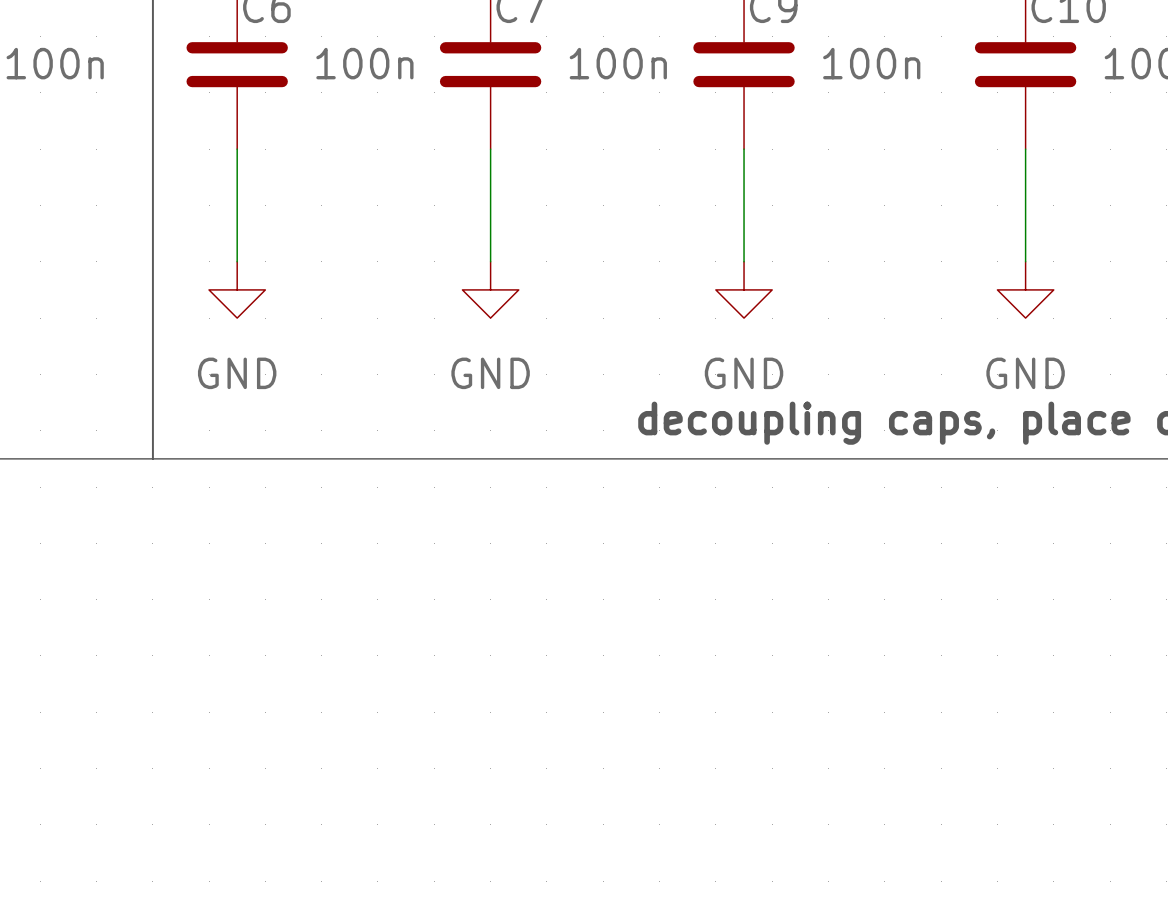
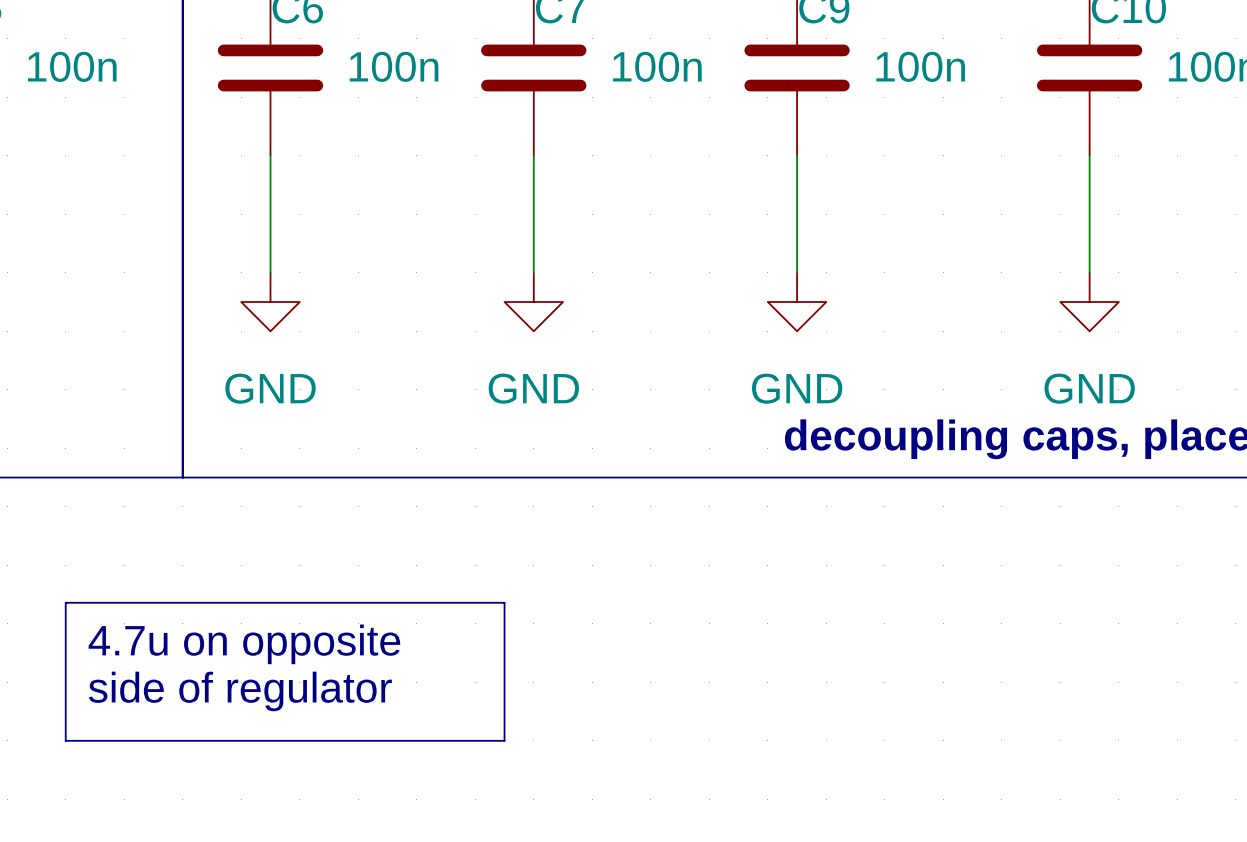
line: none -> (65, 602) (504, 602) (504, 740) (65, 740) (65, 602)
text: none -> 4.7u on opposite (244, 644)
text: none -> side of regulator (240, 691)

